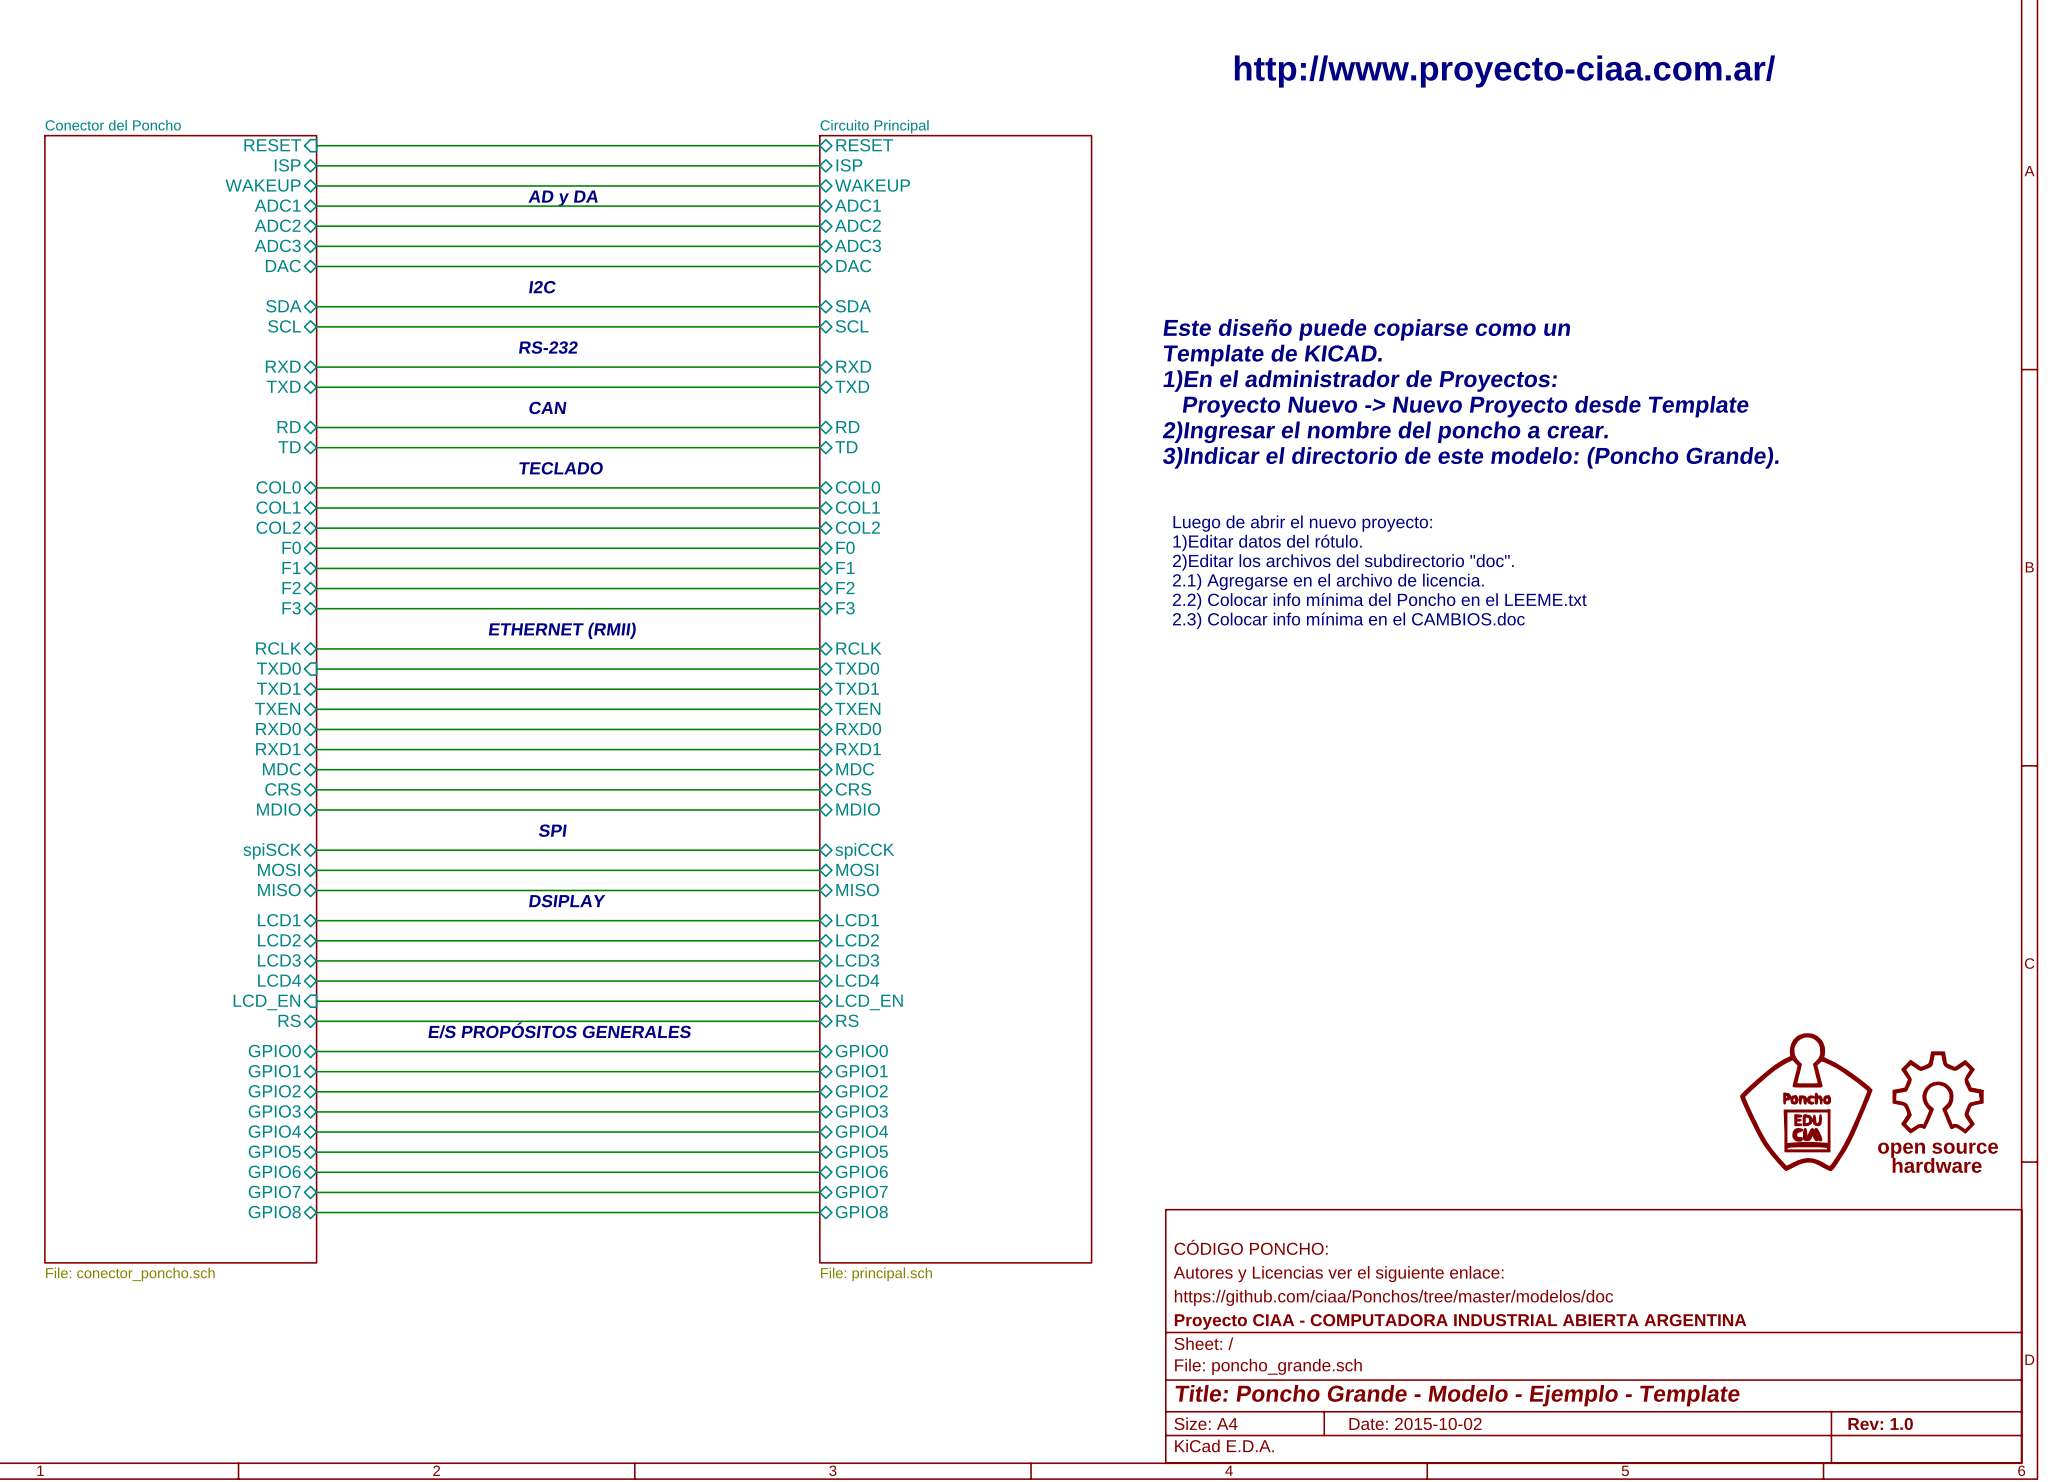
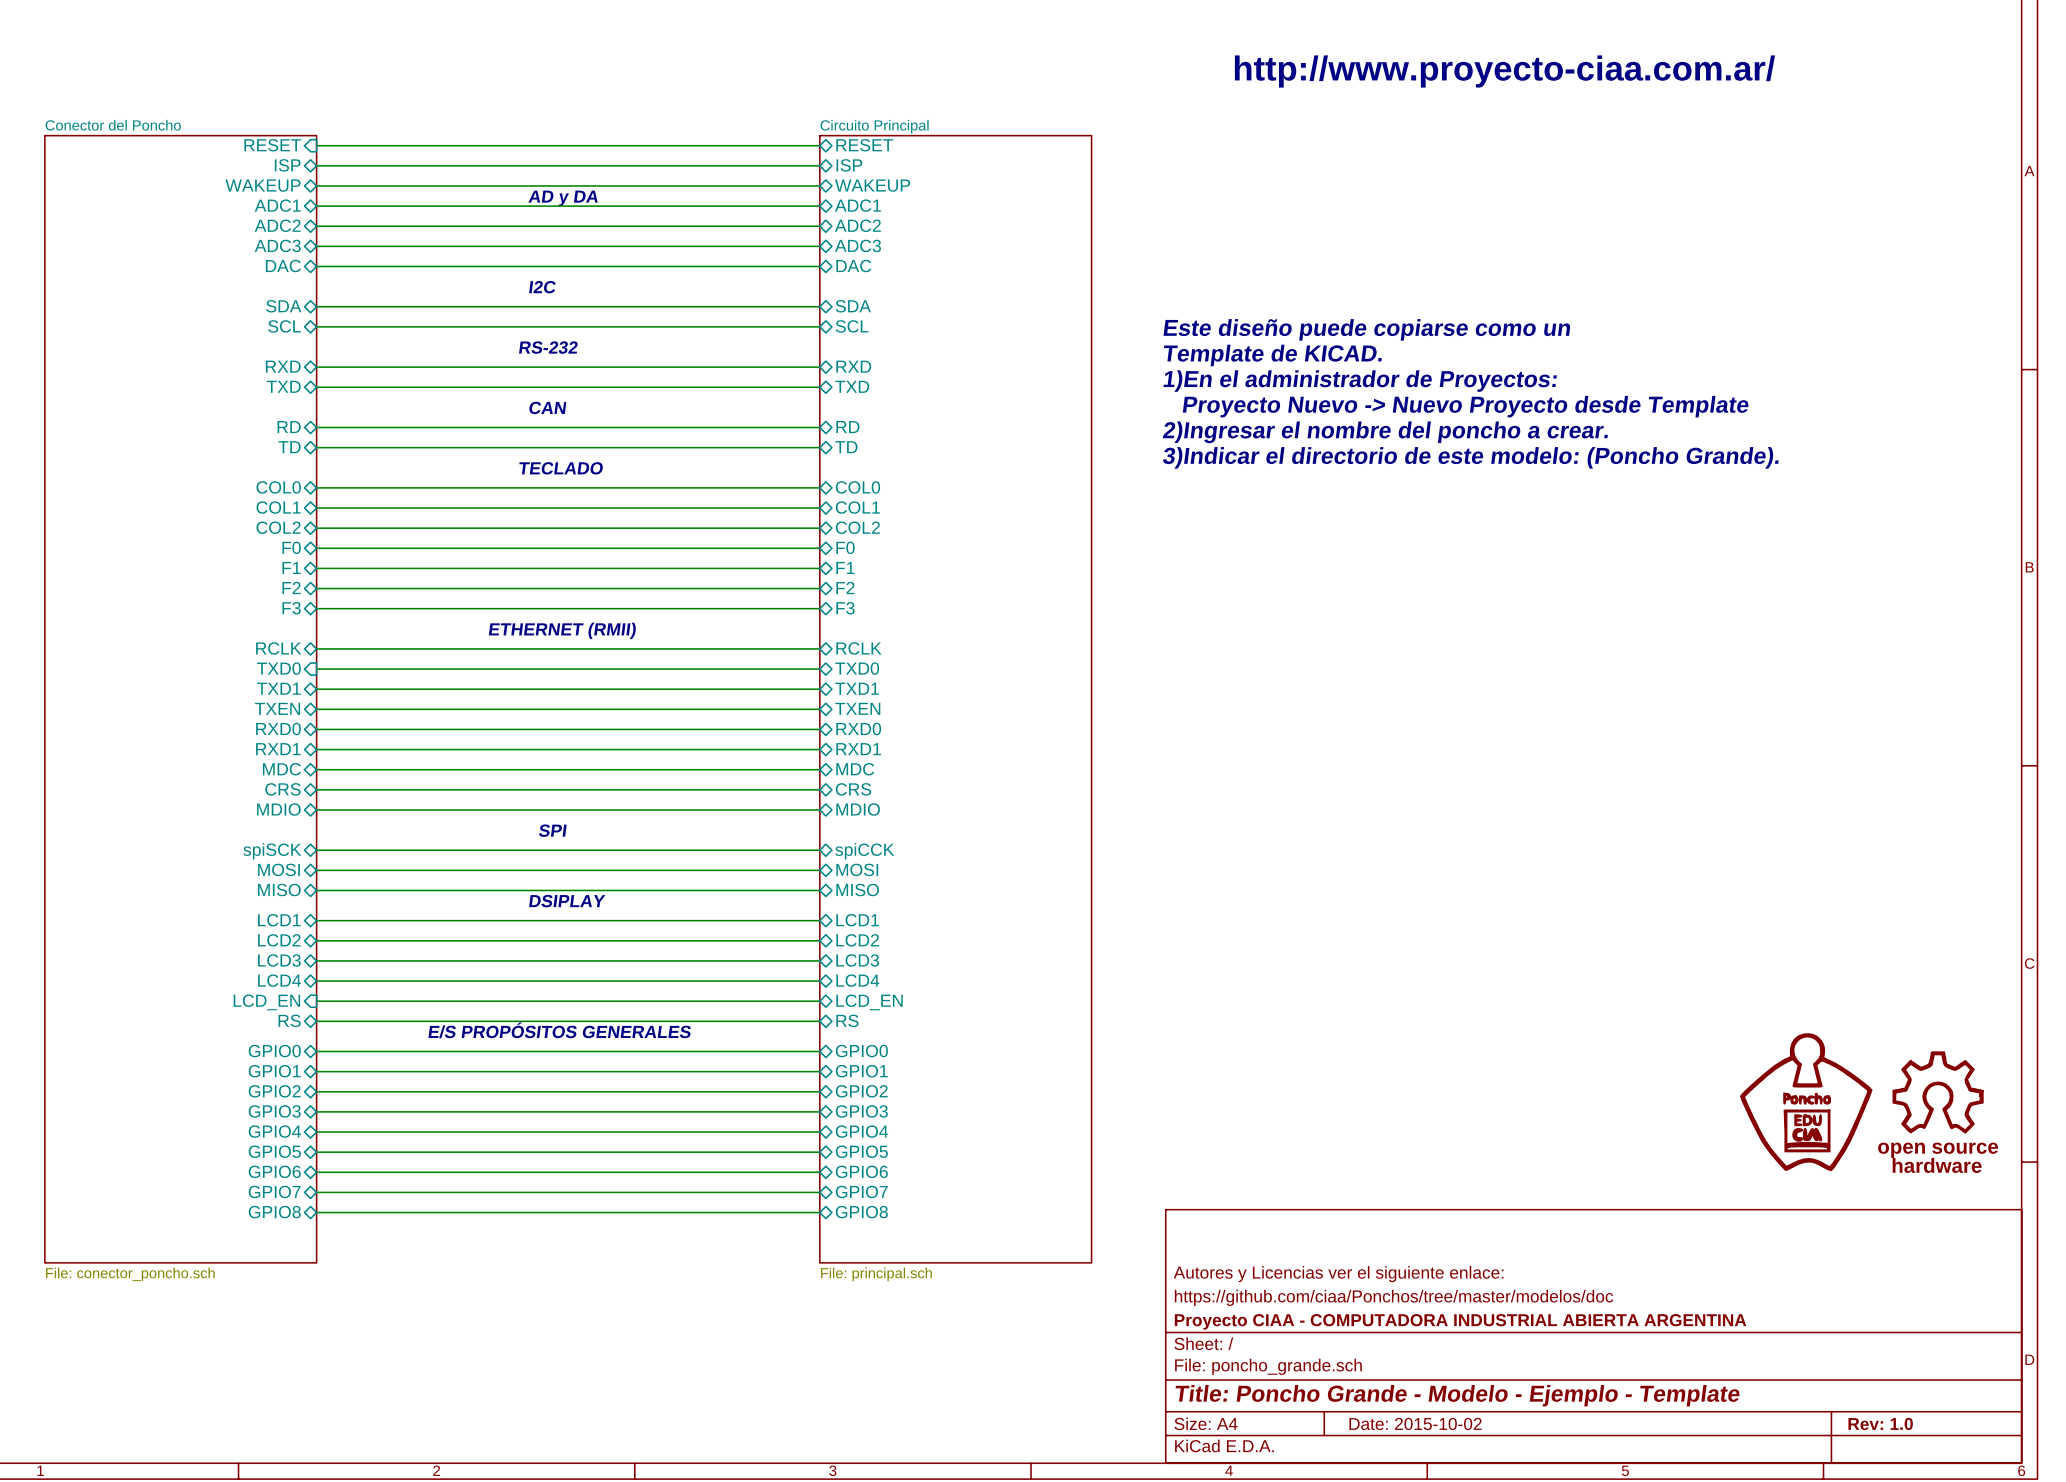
text: Luego de abrir el nuevo proyecto: (1302, 523) -> none
text: 1)Editar datos del rótulo. (1267, 542) -> none
text: 2)Editar los archivos del subdirectorio "doc". (1343, 562) -> none
text: 2.1) Agregarse en el archivo de licencia. (1328, 581) -> none
text: 2.2) Colocar info mínima del Poncho en el LEEME.txt (1379, 601) -> none
text: 2.3) Colocar info mínima en el CAMBIOS.doc (1348, 620) -> none
title block: CÓDIGO PONCHO: (1251, 1247) -> none

